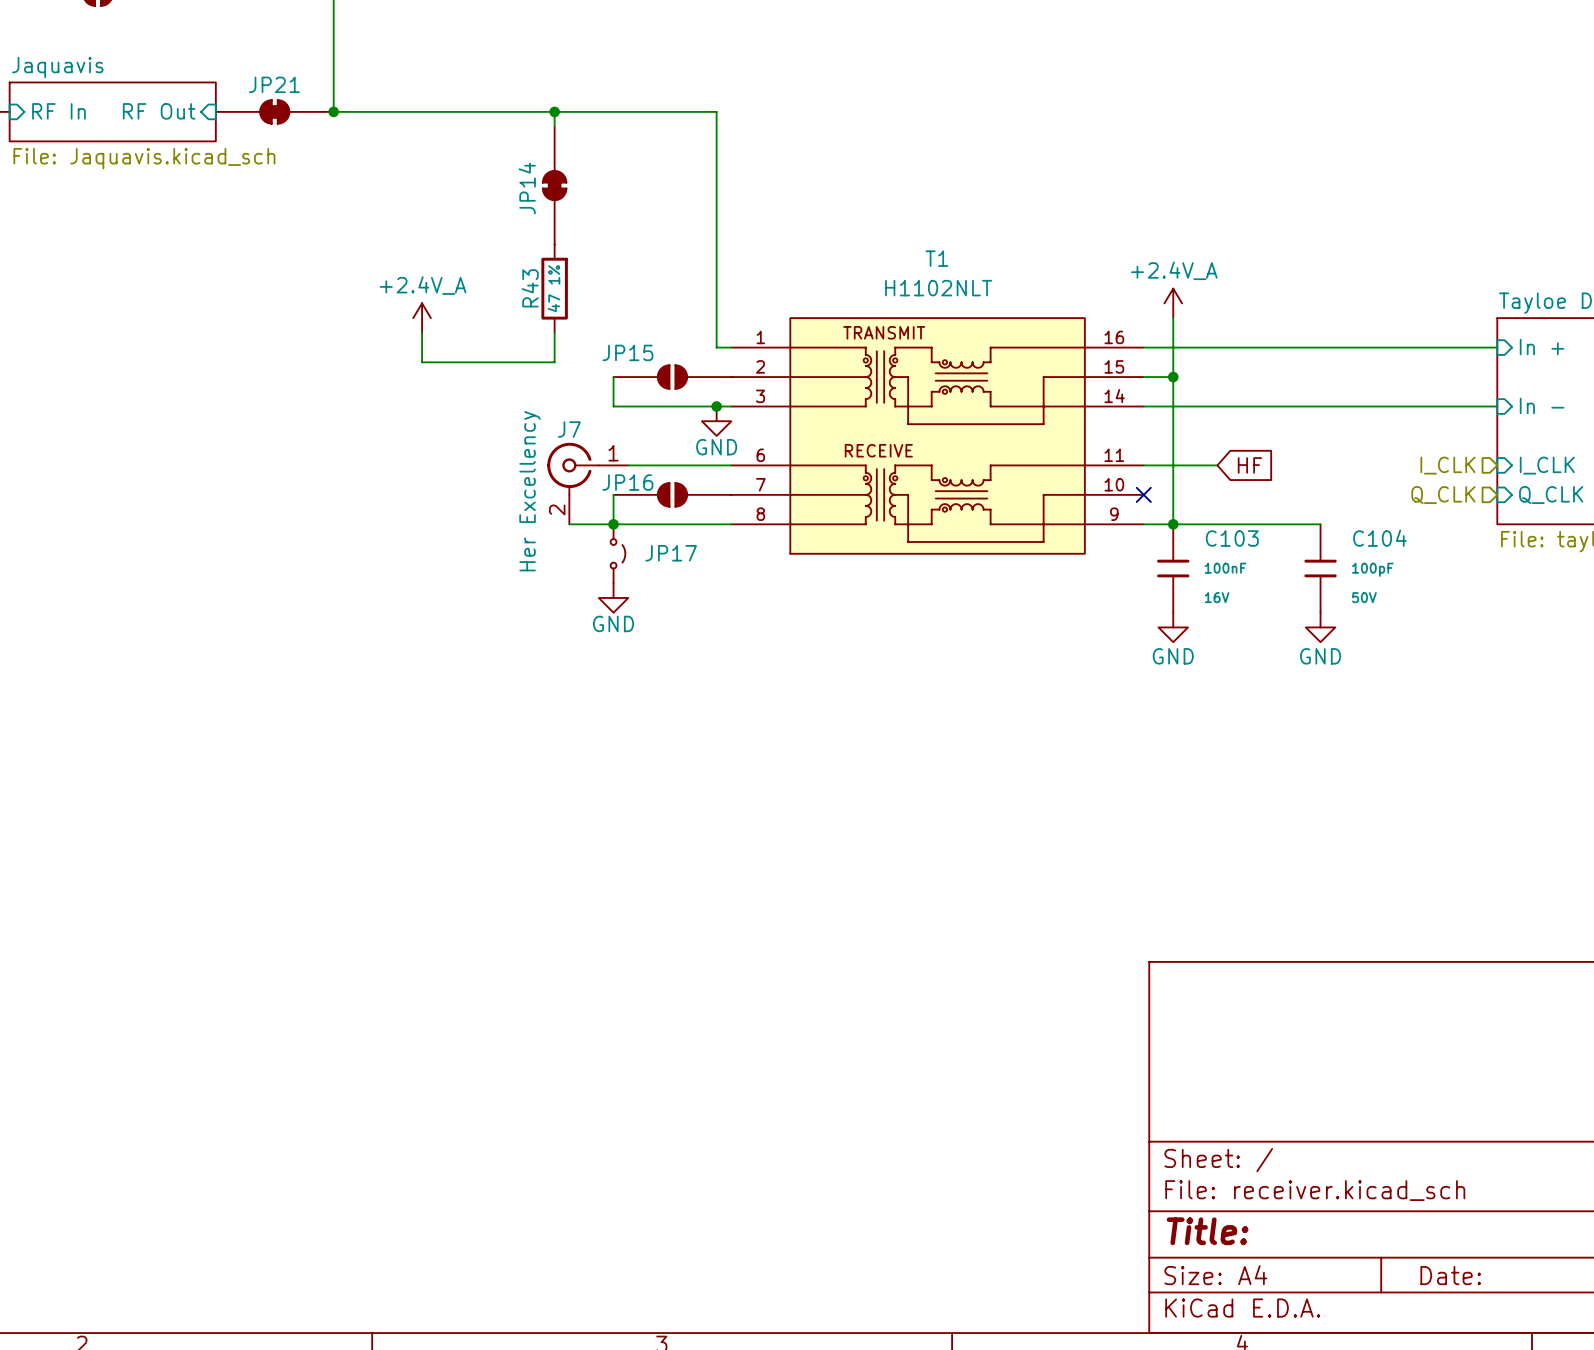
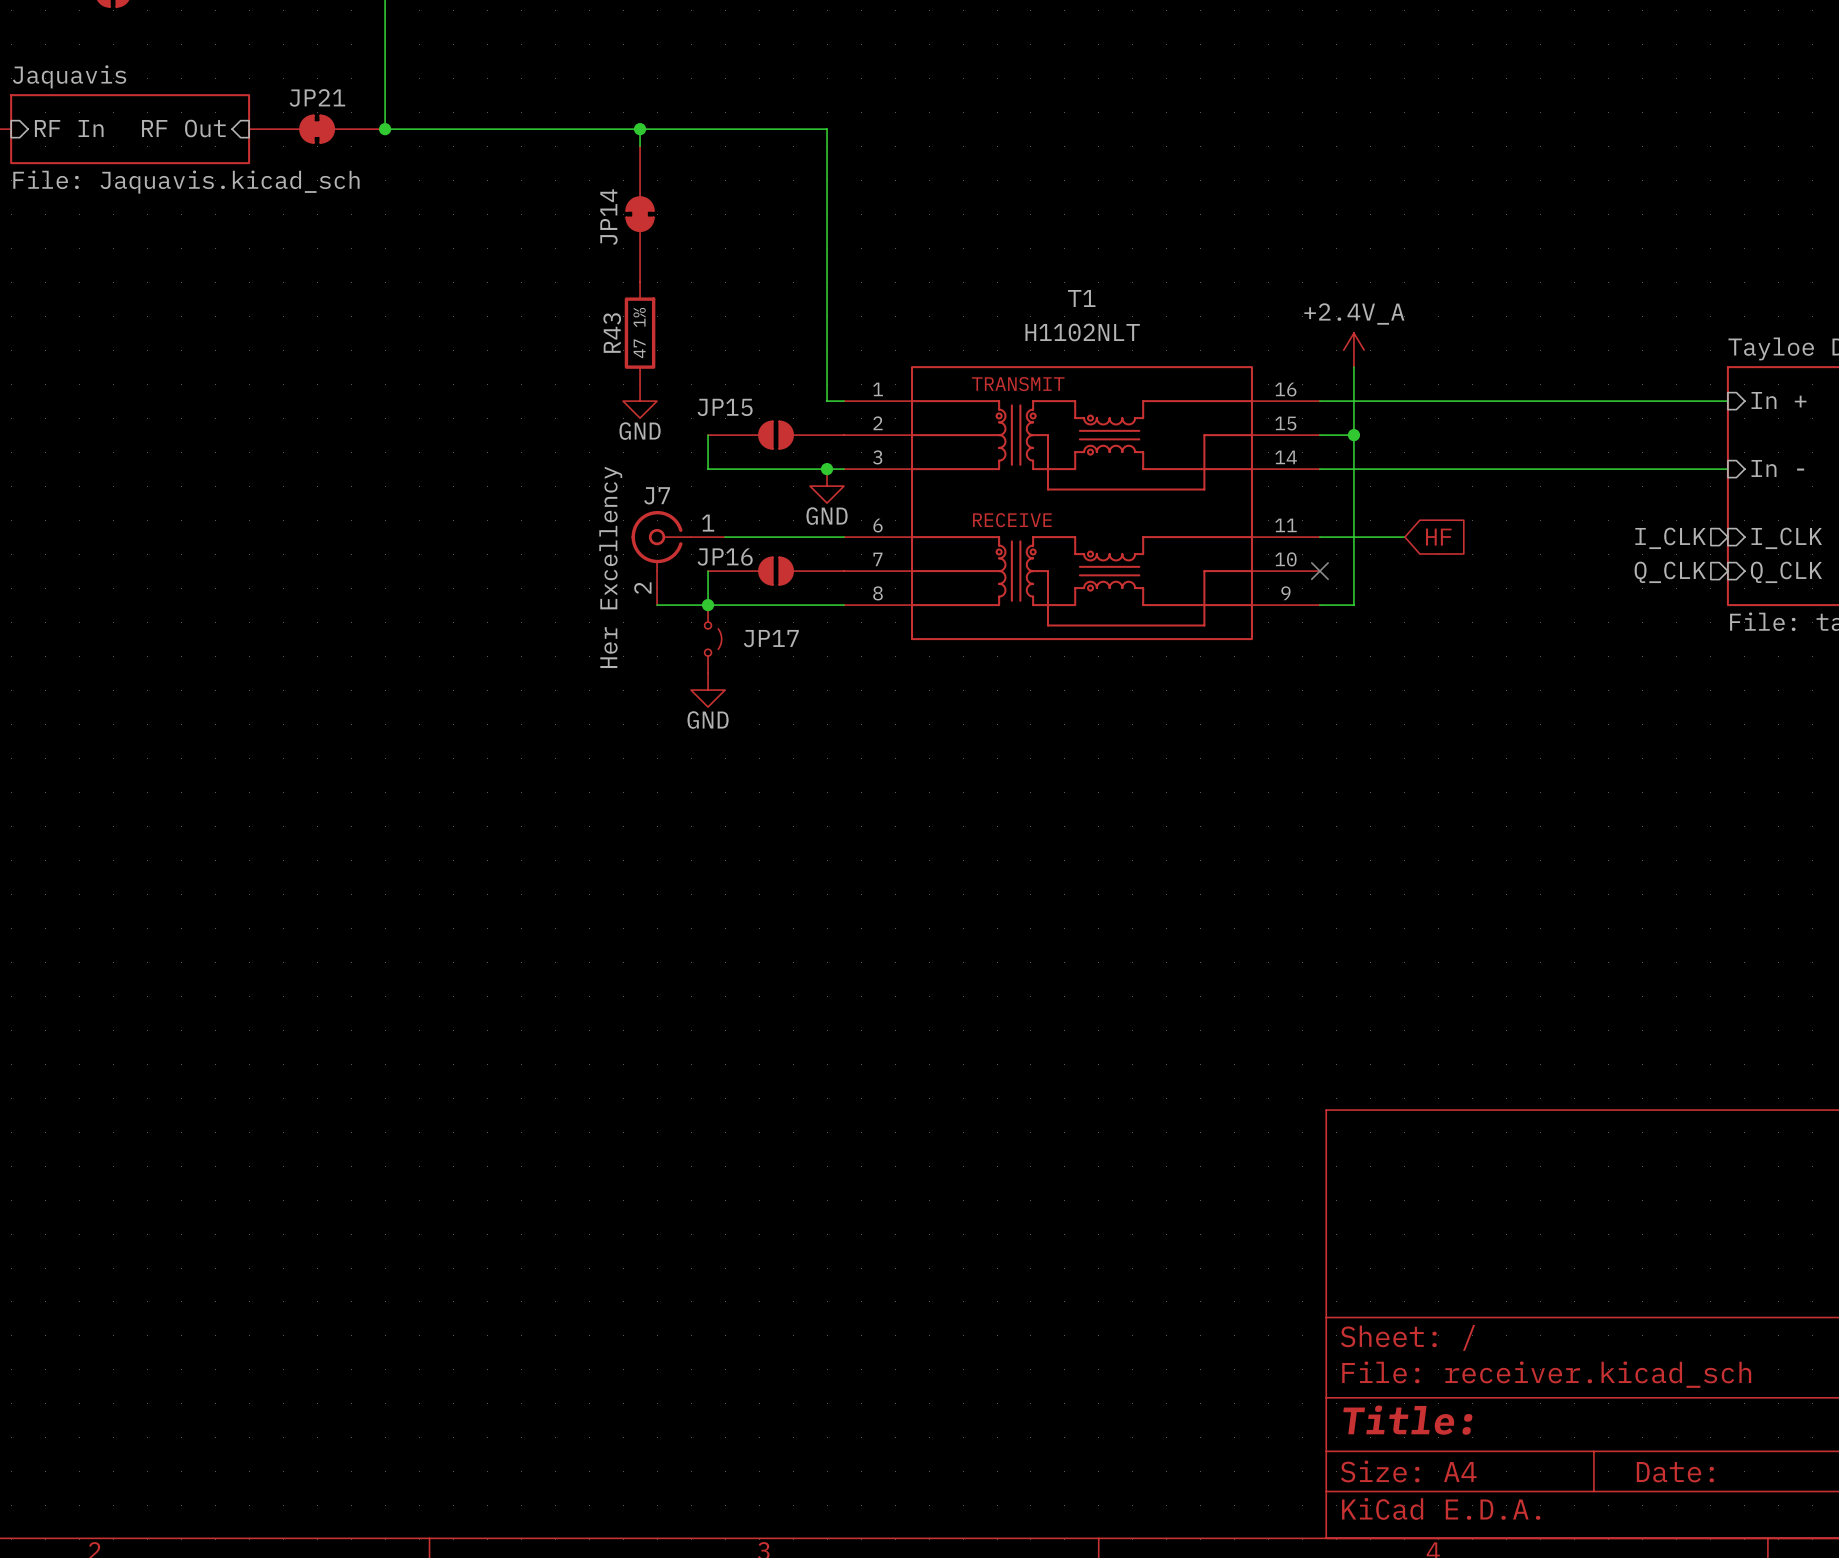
power symbol: +2.4V_A (422, 318) -> none
wire: (422, 332) (422, 362) (554, 362) (554, 332) -> none
power symbol: none -> GND (640, 401)
wire: (1173, 524) (1320, 524) -> none
junction: (1173, 524) -> none
C103: 100nF (1173, 568) -> none
C104: 100pF (1320, 568) -> none
power symbol: GND (1173, 627) -> none
power symbol: GND (1320, 627) -> none

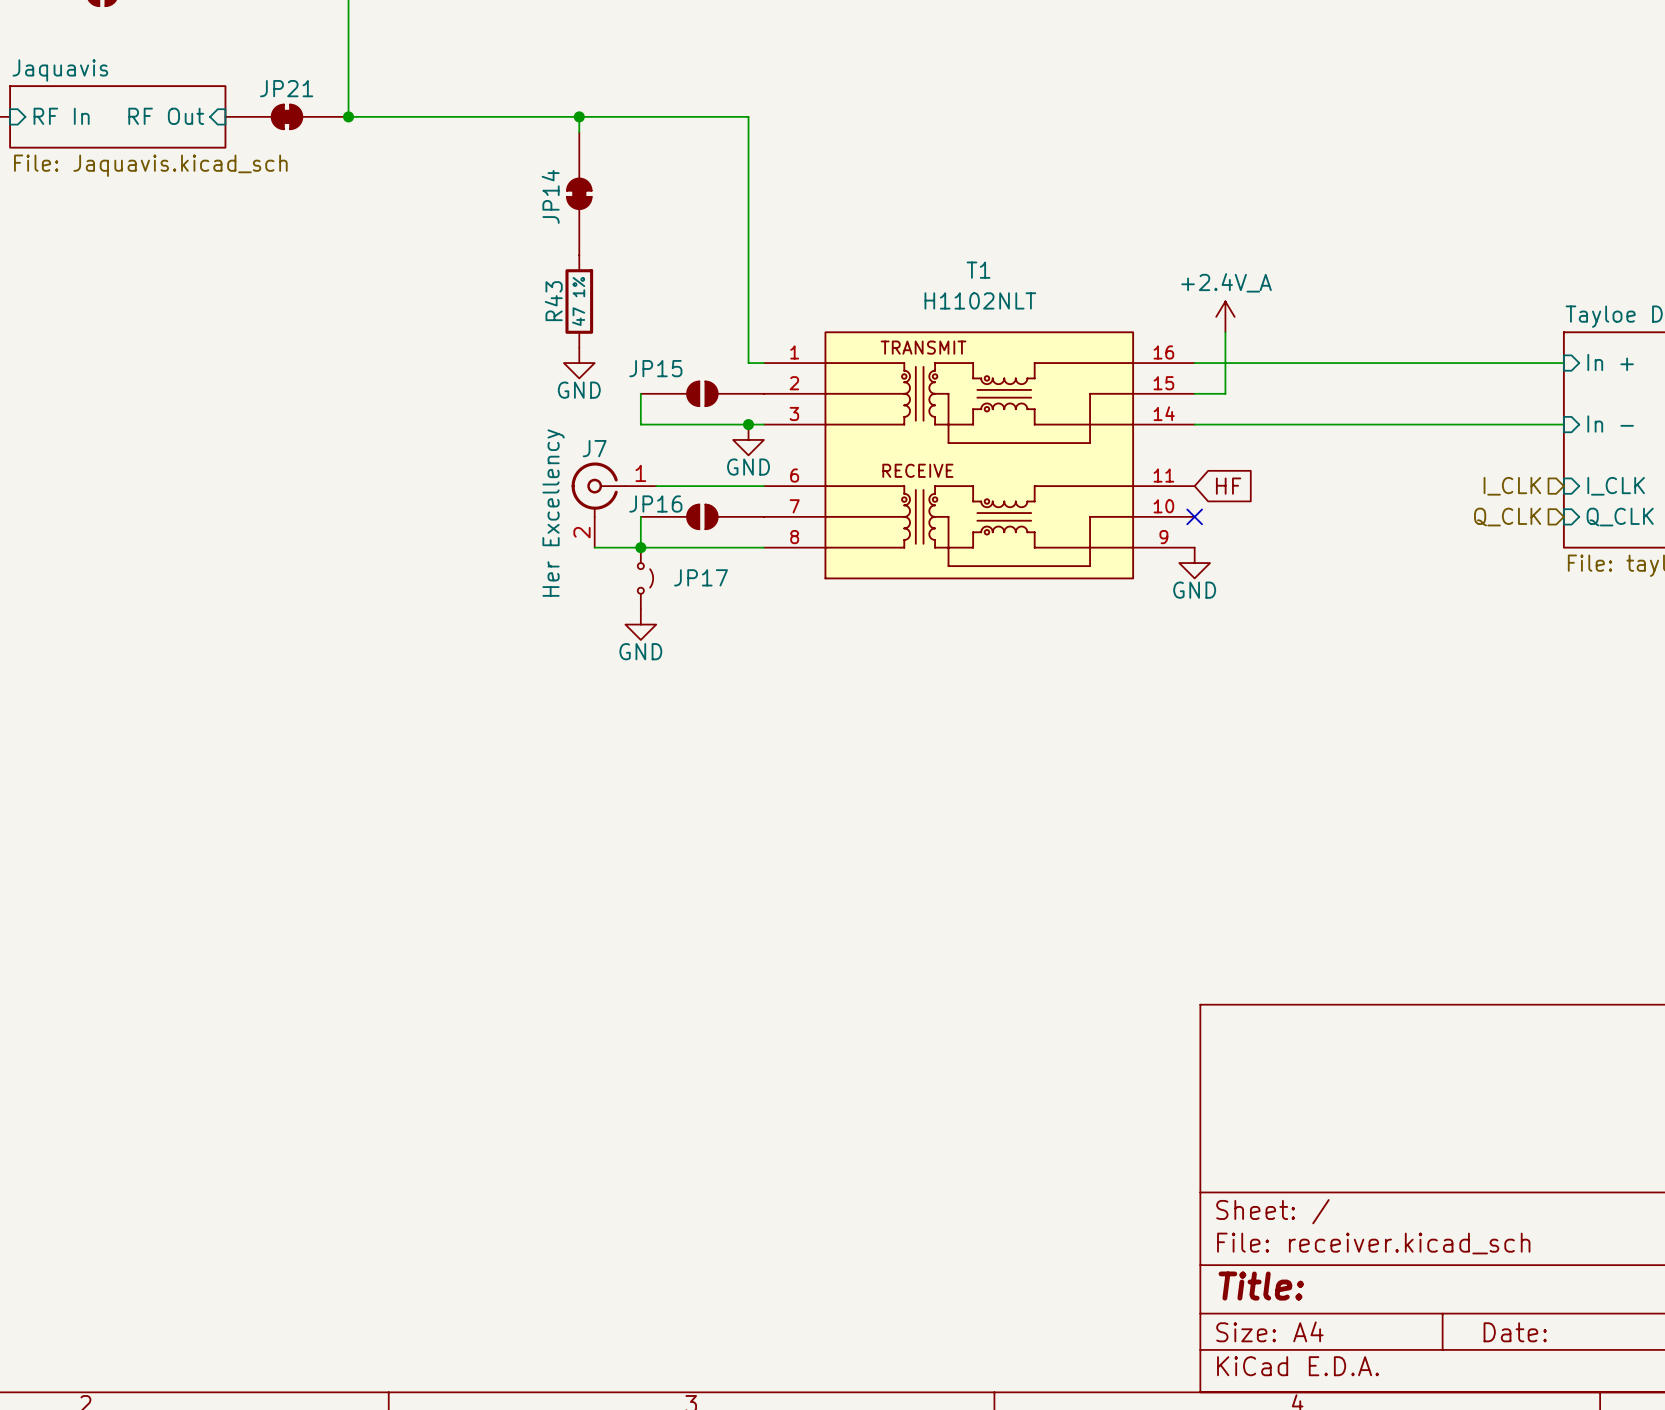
wire: (1353, 435) (1353, 605) (1319, 605) -> none
junction: (1353, 435) -> none
wire: (1319, 537) (1404, 537) -> none
global label position: HF (1438, 537) -> HF (1228, 486)
power symbol: none -> GND (1194, 563)

